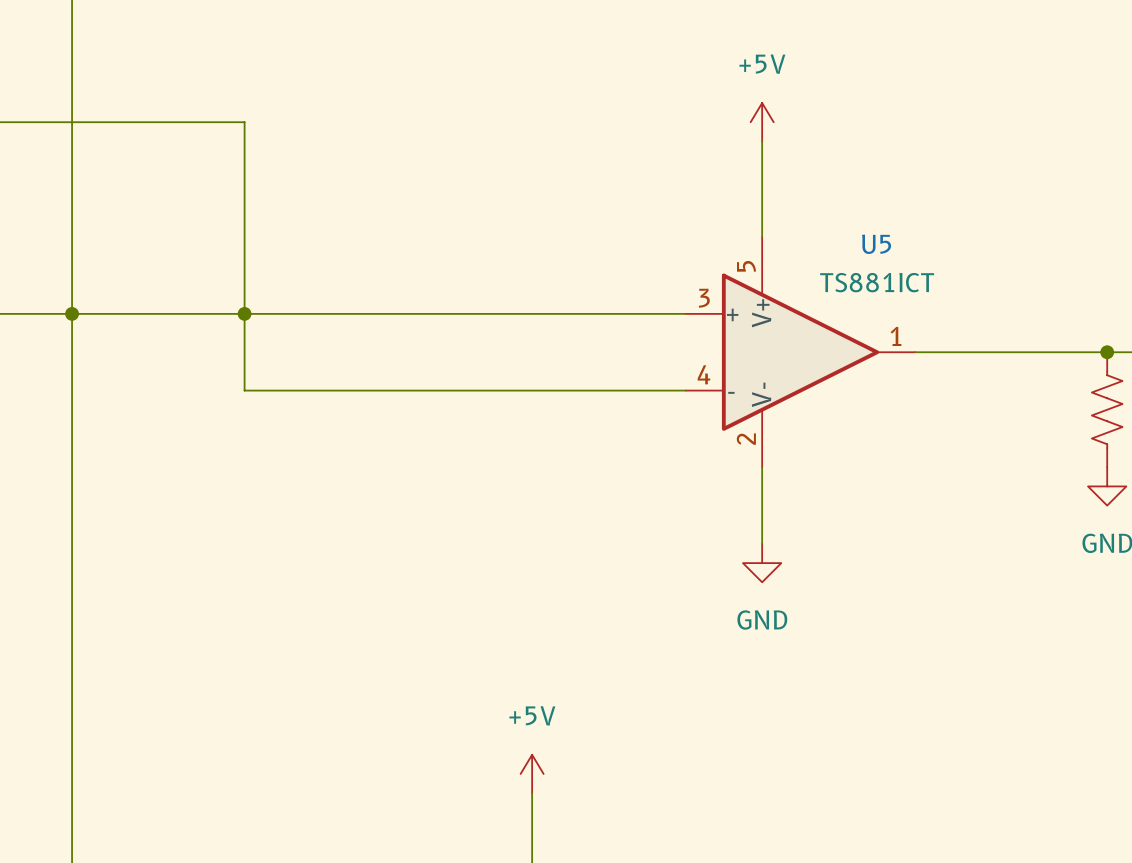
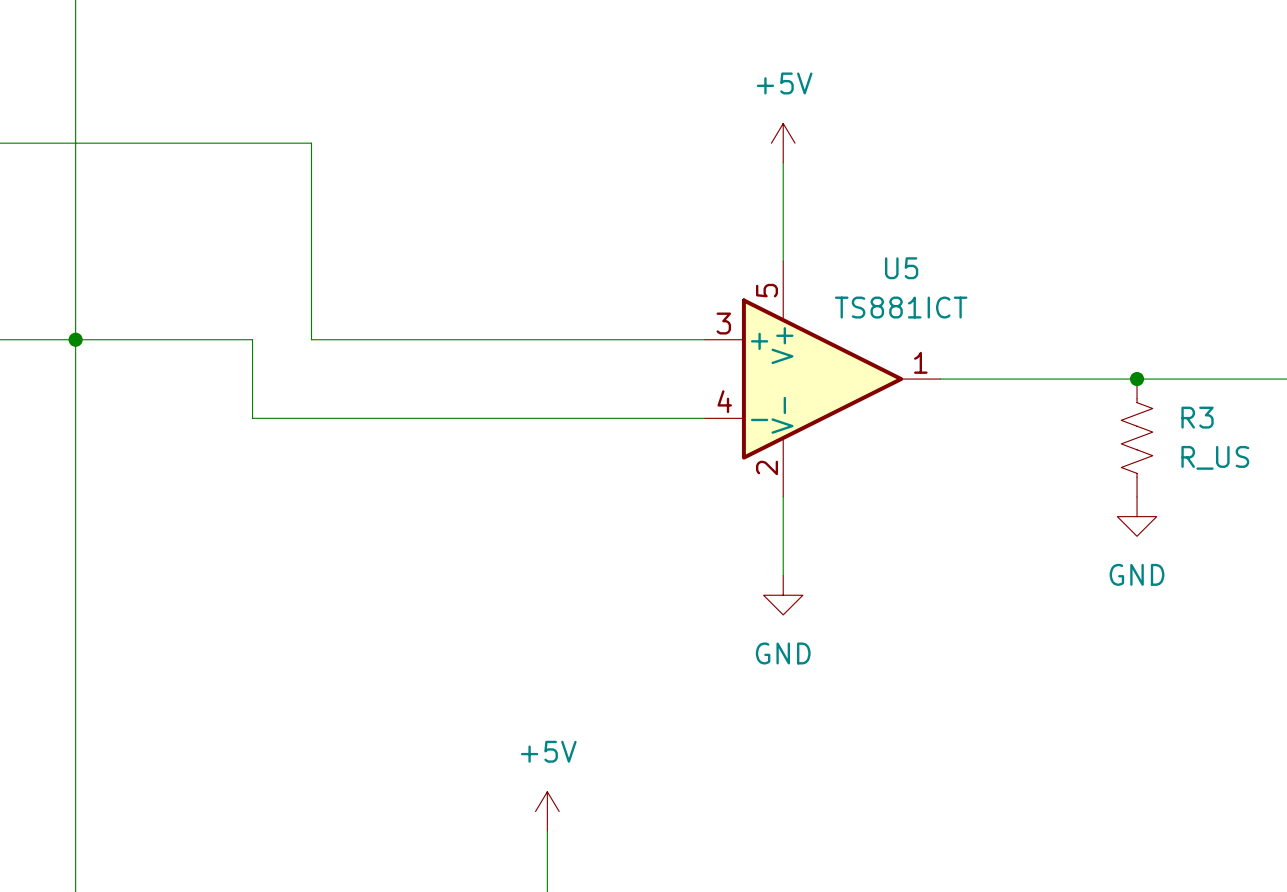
wire: (244, 122) (244, 313) (302, 313) -> (252, 143) (311, 143) (311, 339)
junction: (244, 313) -> none

